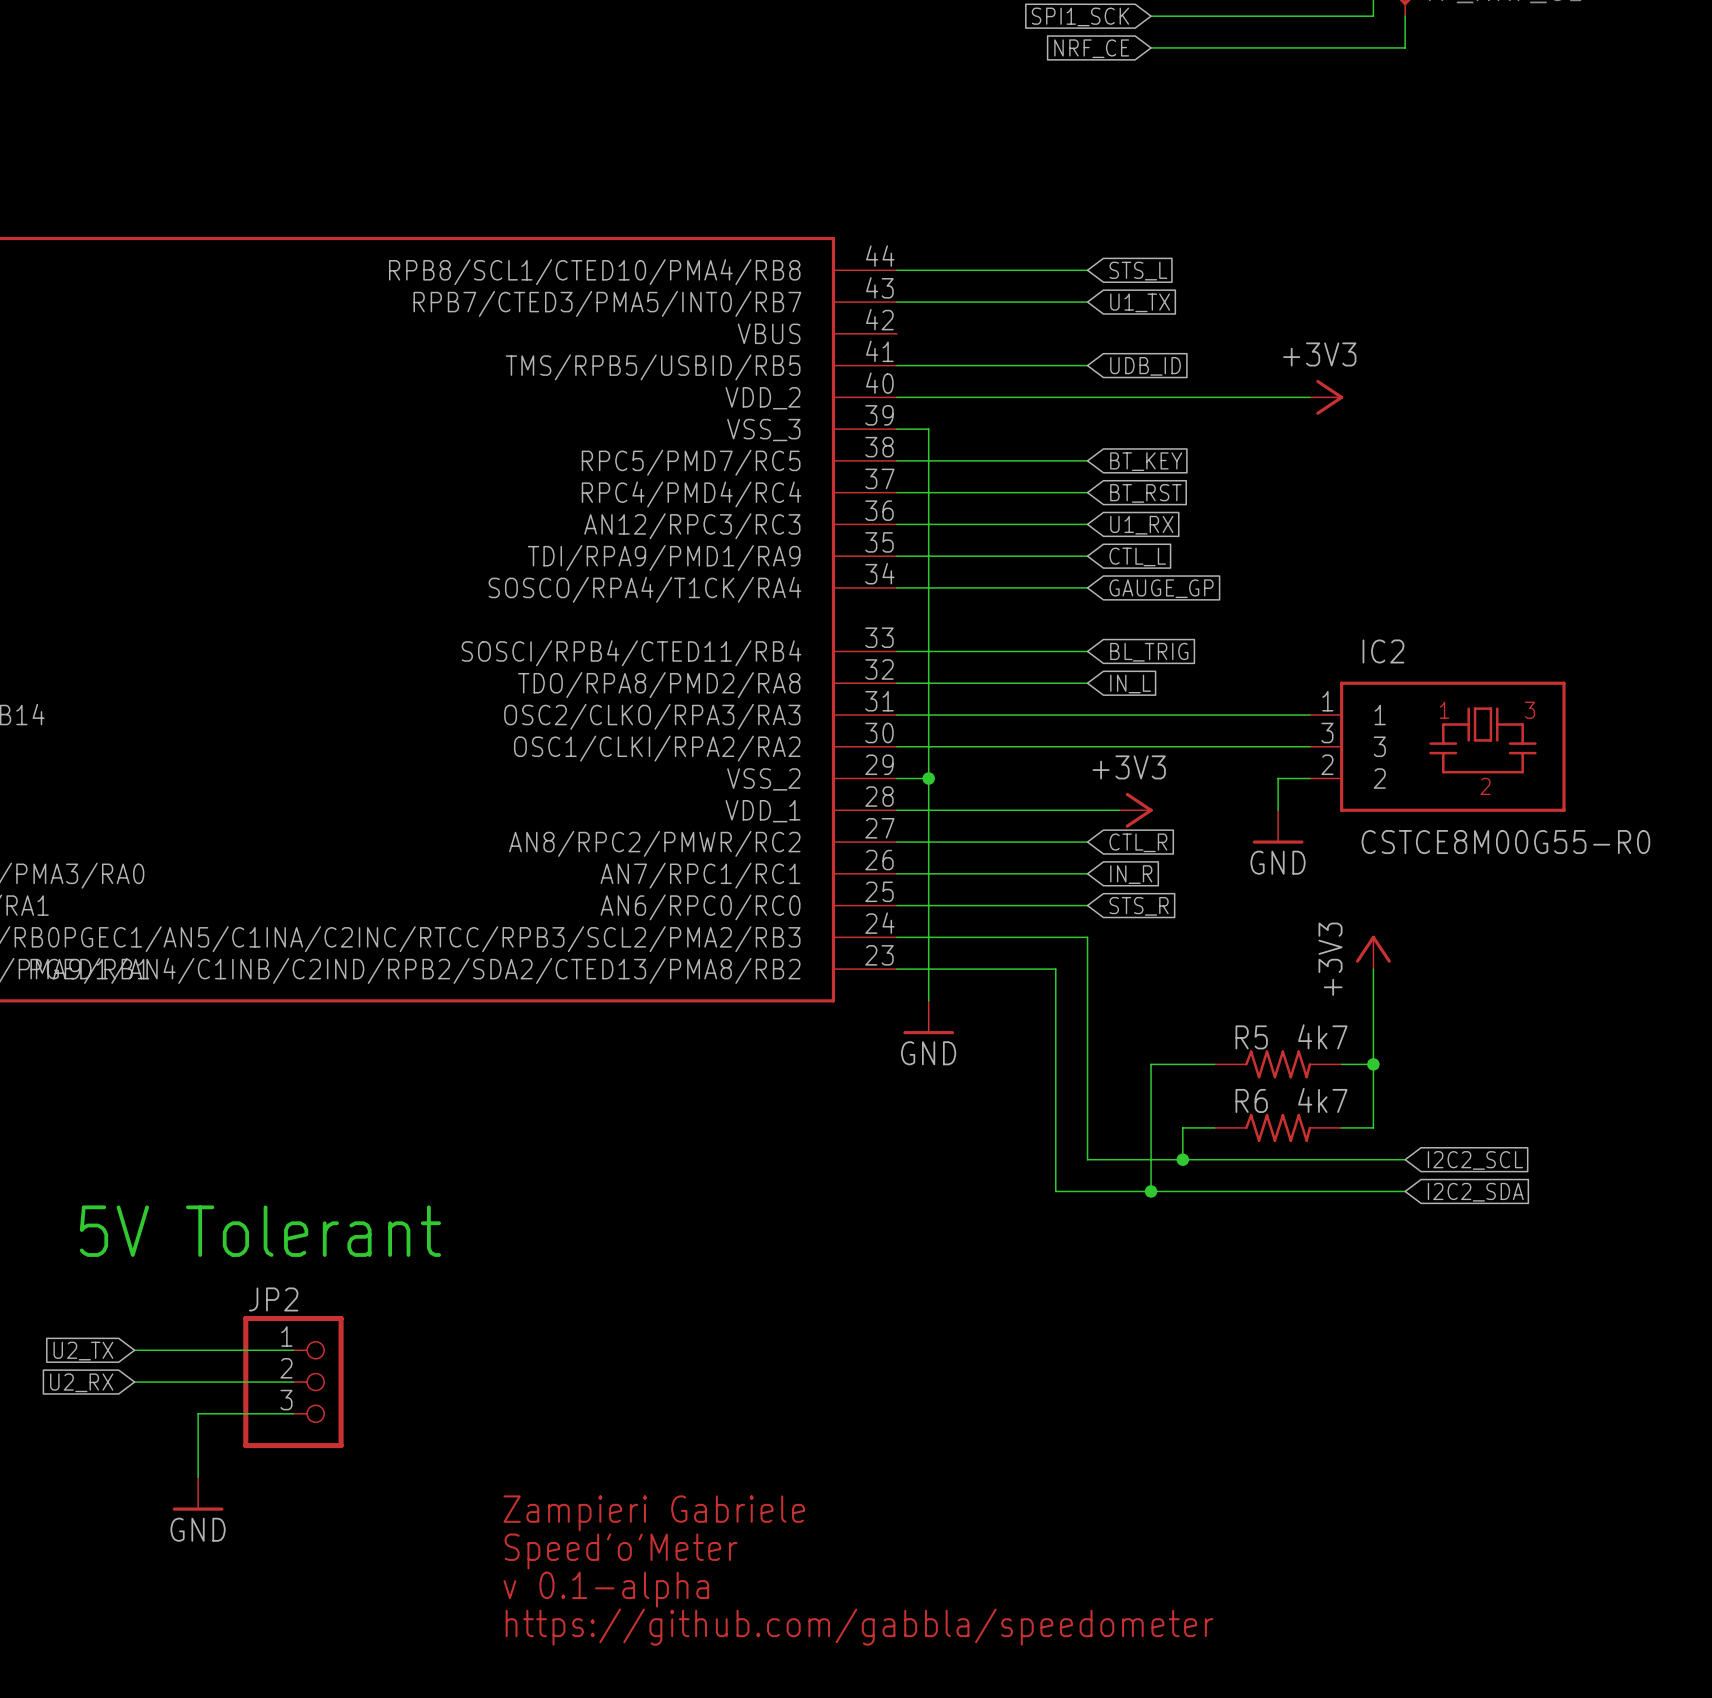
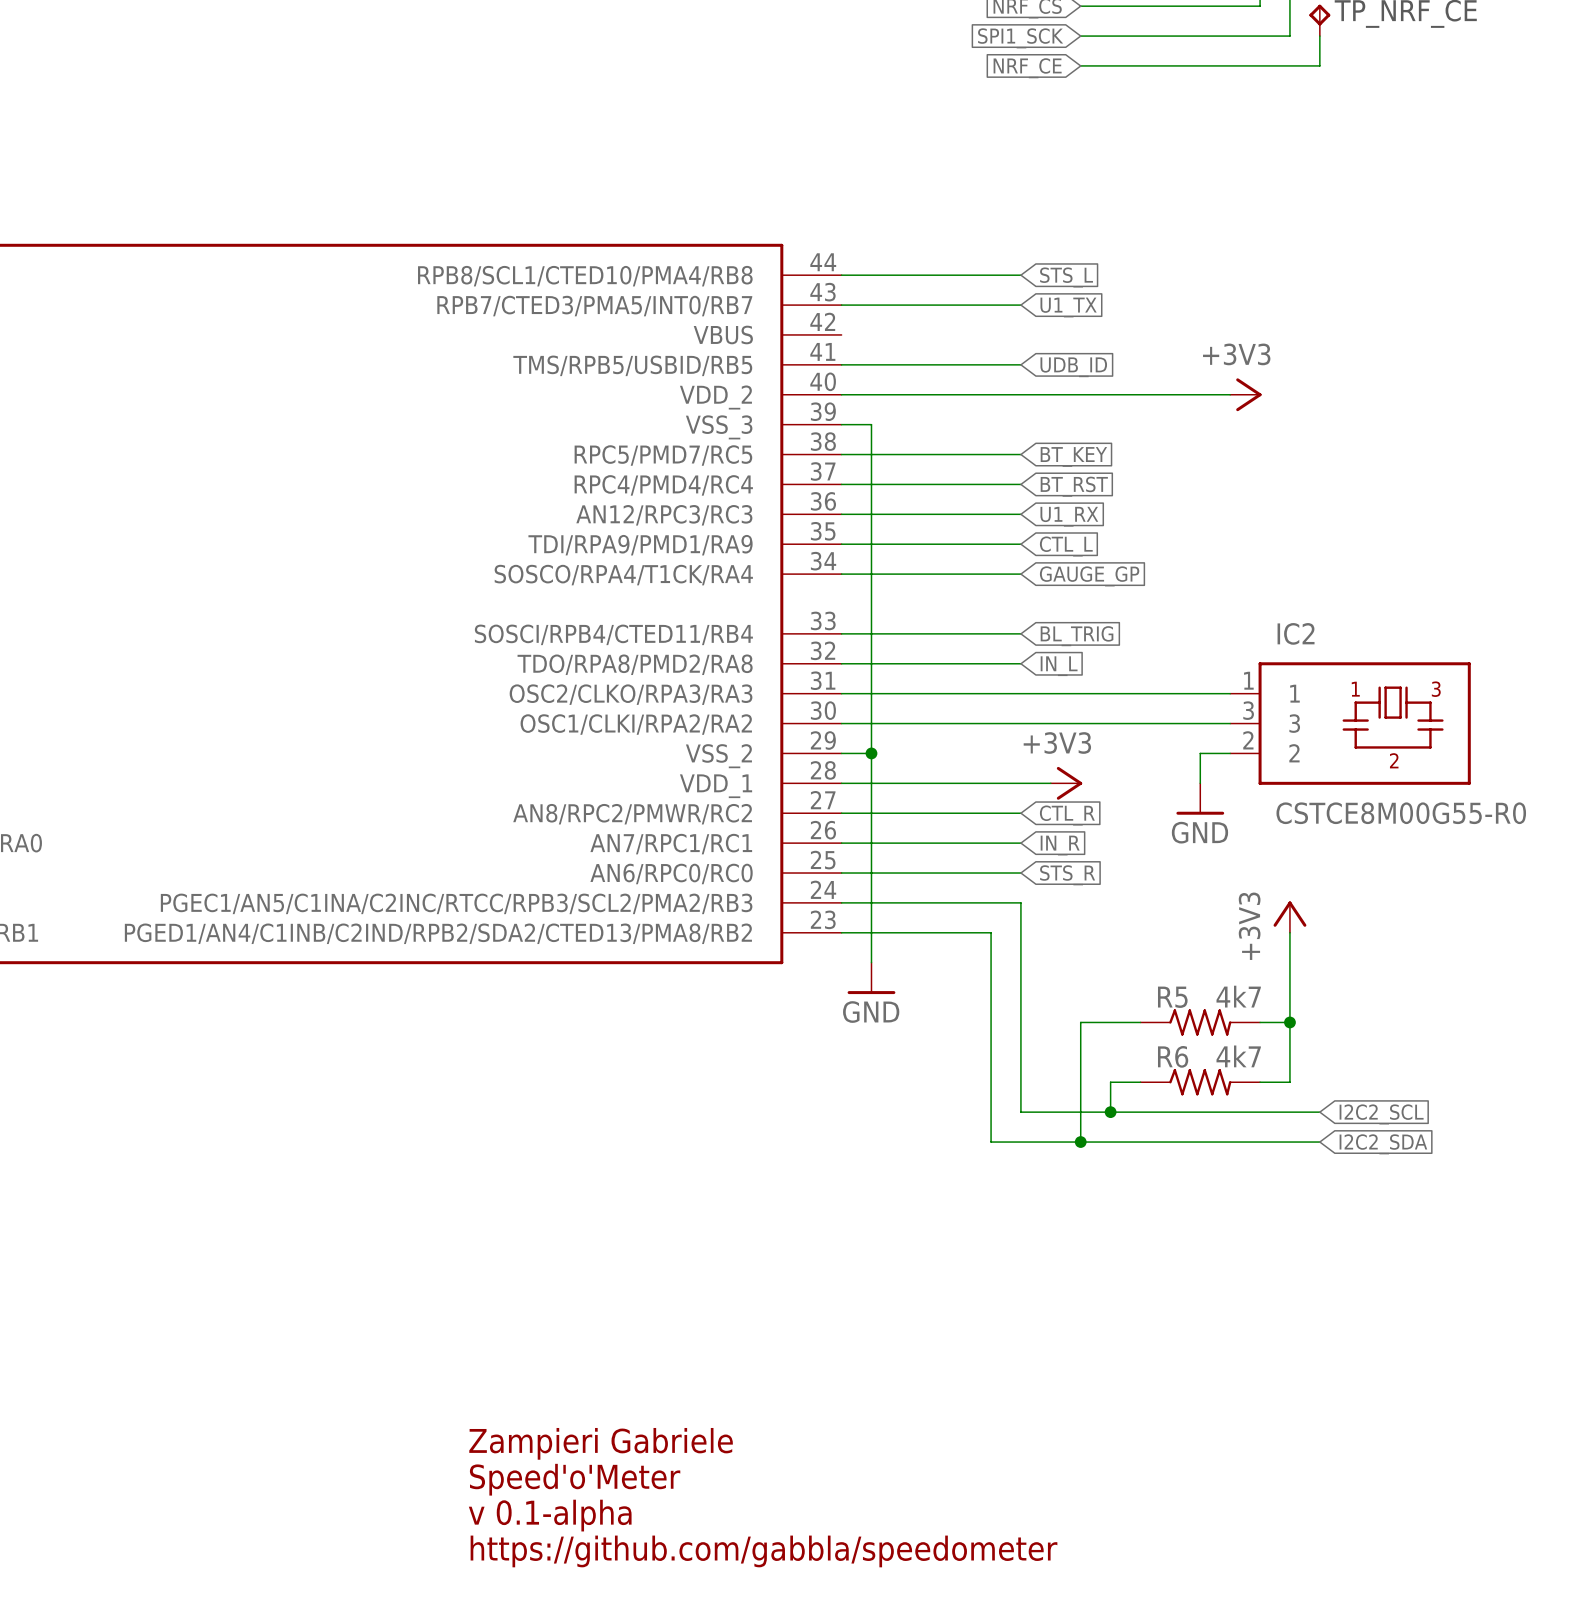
text: 5V Tolerant (260, 1231) -> none
wire: (134, 1350) (293, 1350) -> none
global label: U2_TX (83, 1351) -> none
global label: U2_RX (81, 1382) -> none
wire: (134, 1382) (293, 1382) -> none
JP2: (293, 1382) -> none
wire: (293, 1413) (198, 1413) (198, 1477) -> none
power symbol: GND (198, 1494) -> none

